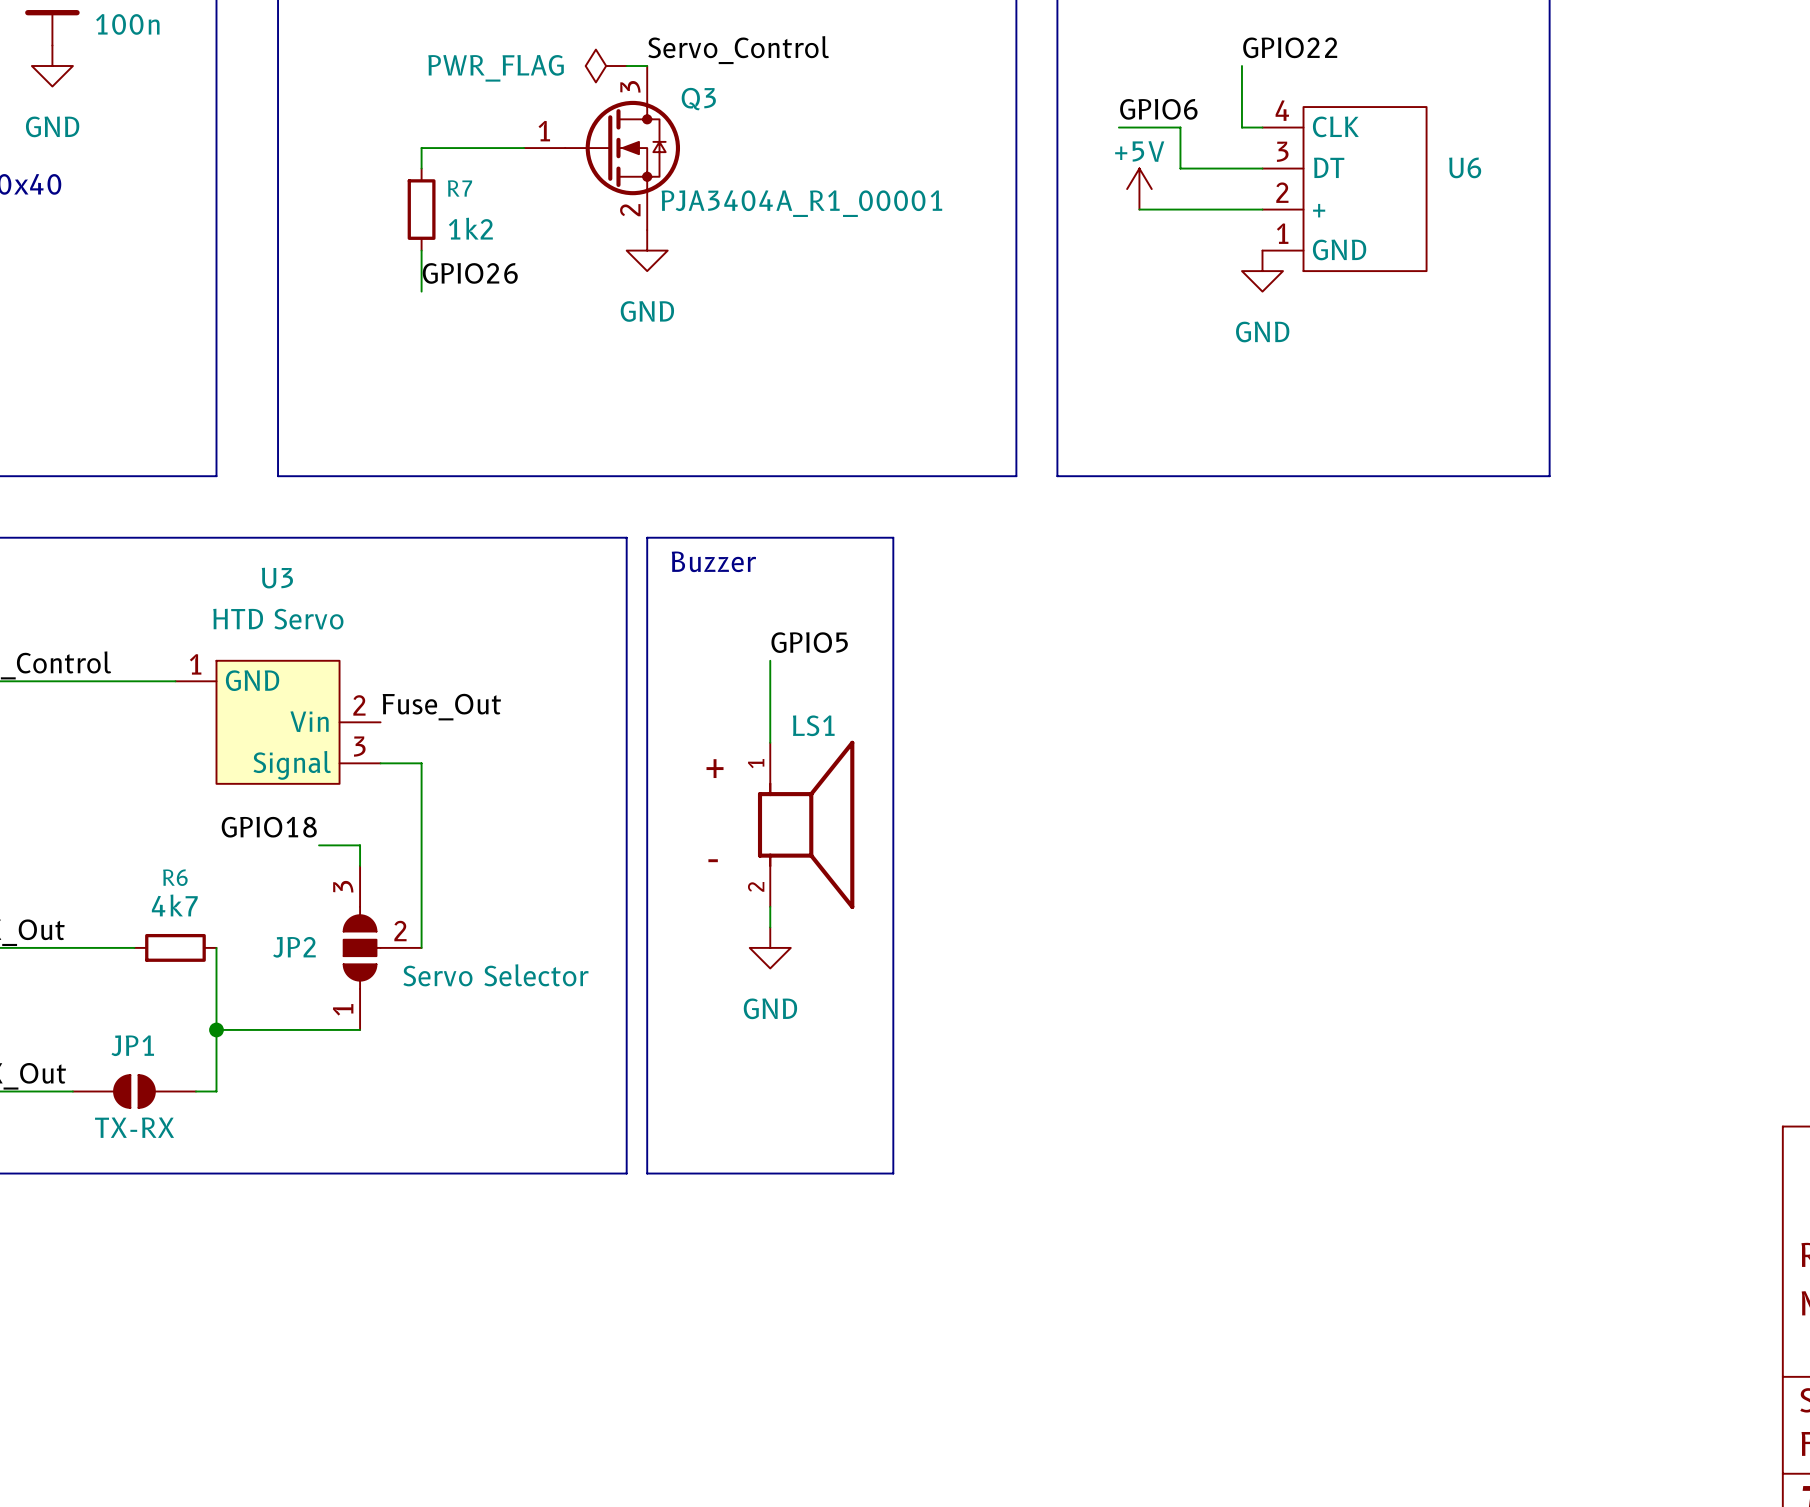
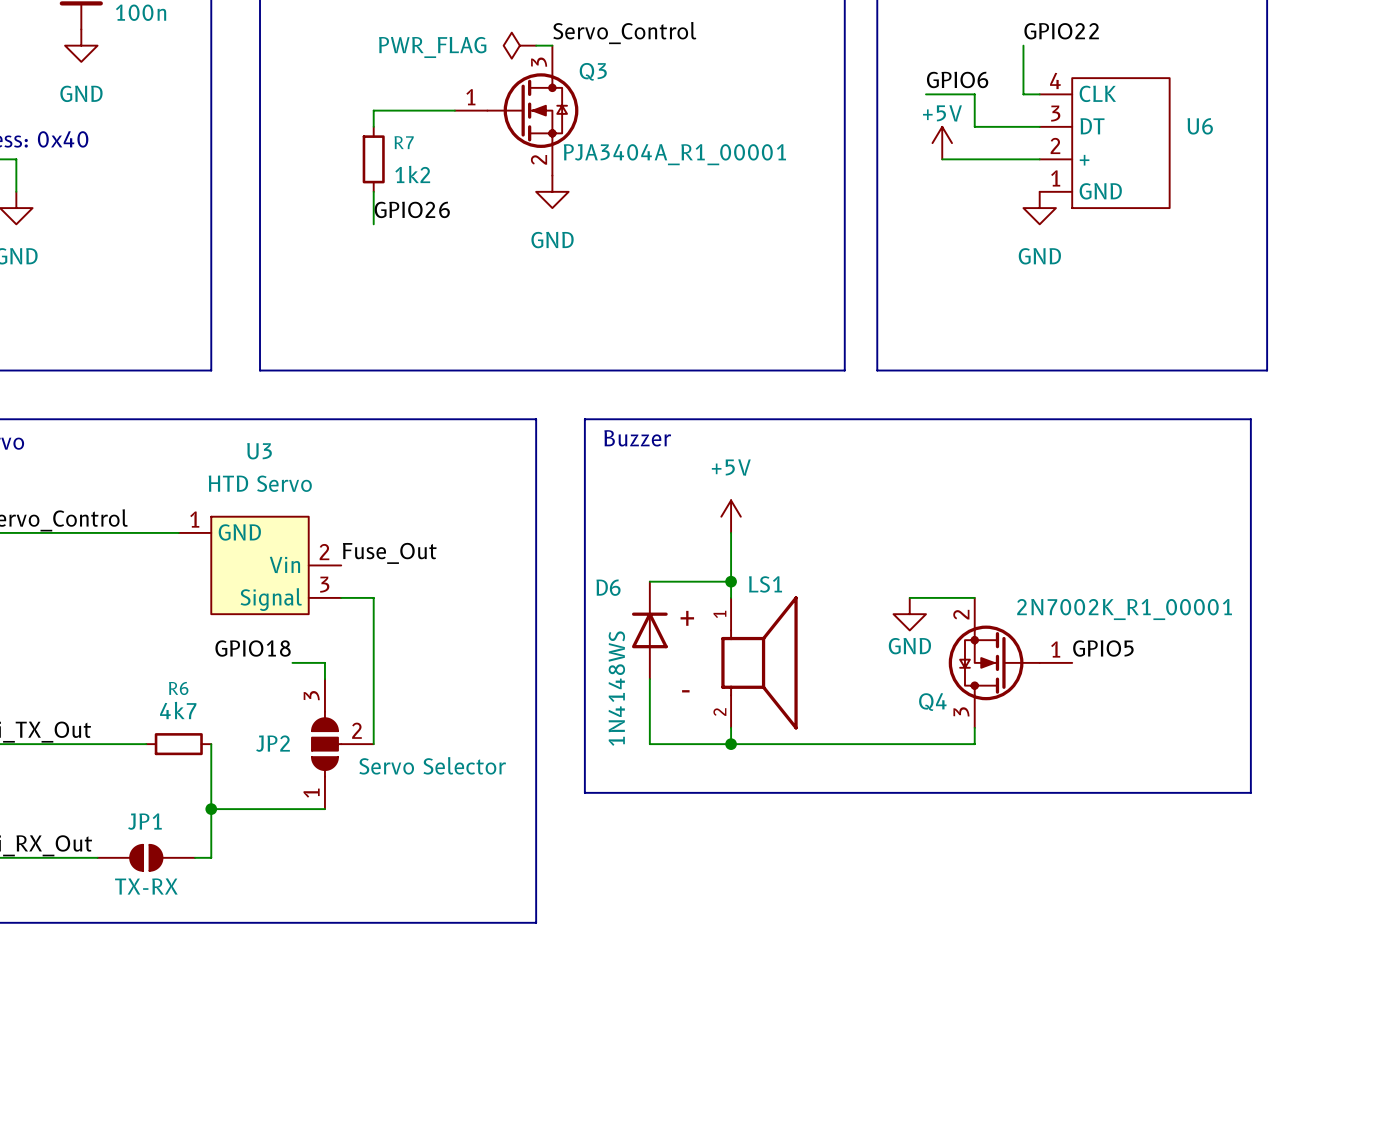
line: (688, 537) (647, 537) (647, 1173) (893, 1173) (893, 537) -> (584, 419) (584, 792) (1250, 792) (1250, 419) (747, 419)
text position: Buzzer (713, 561) -> Buzzer (637, 438)
label: GPIO5 (809, 642) -> none
wire: (770, 660) (770, 742) -> (731, 581) (649, 581)
power symbol: none -> +5V (731, 516)
wire: none -> (731, 532) (731, 597)
junction: none -> (731, 581)
wire: none -> (909, 597) (974, 597)
D6: none -> 1N4148WS (649, 630)
LS1 position: (806, 824) -> (759, 662)
label: none -> GPIO5 (1103, 648)
Q4: none -> 2N7002K_R1_00001 (1010, 662)
wire: none -> (649, 727) (649, 744) (974, 744) (974, 727)
wire: none -> (731, 727) (731, 744)
power symbol position: GND (770, 947) -> GND (909, 614)
junction: none -> (731, 744)
power symbol text position: GND (770, 1008) -> GND (909, 646)

